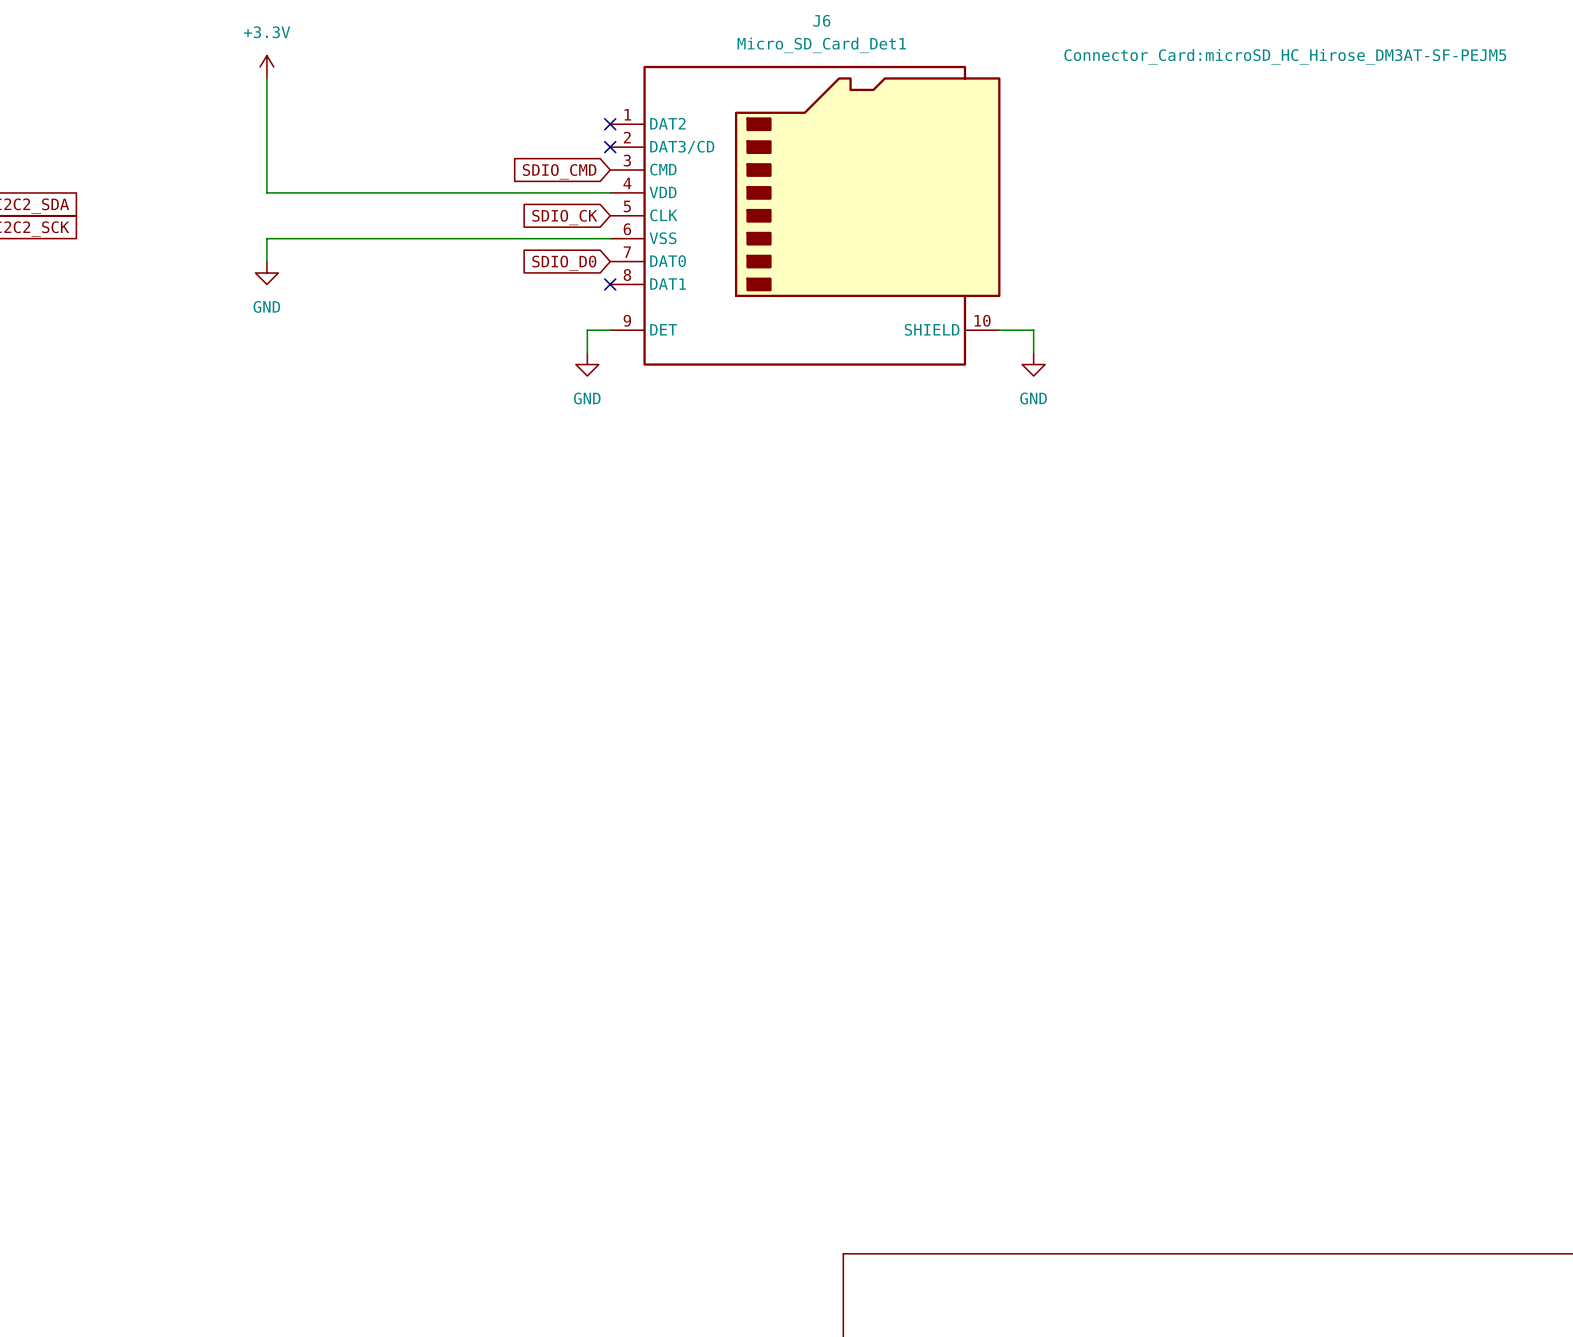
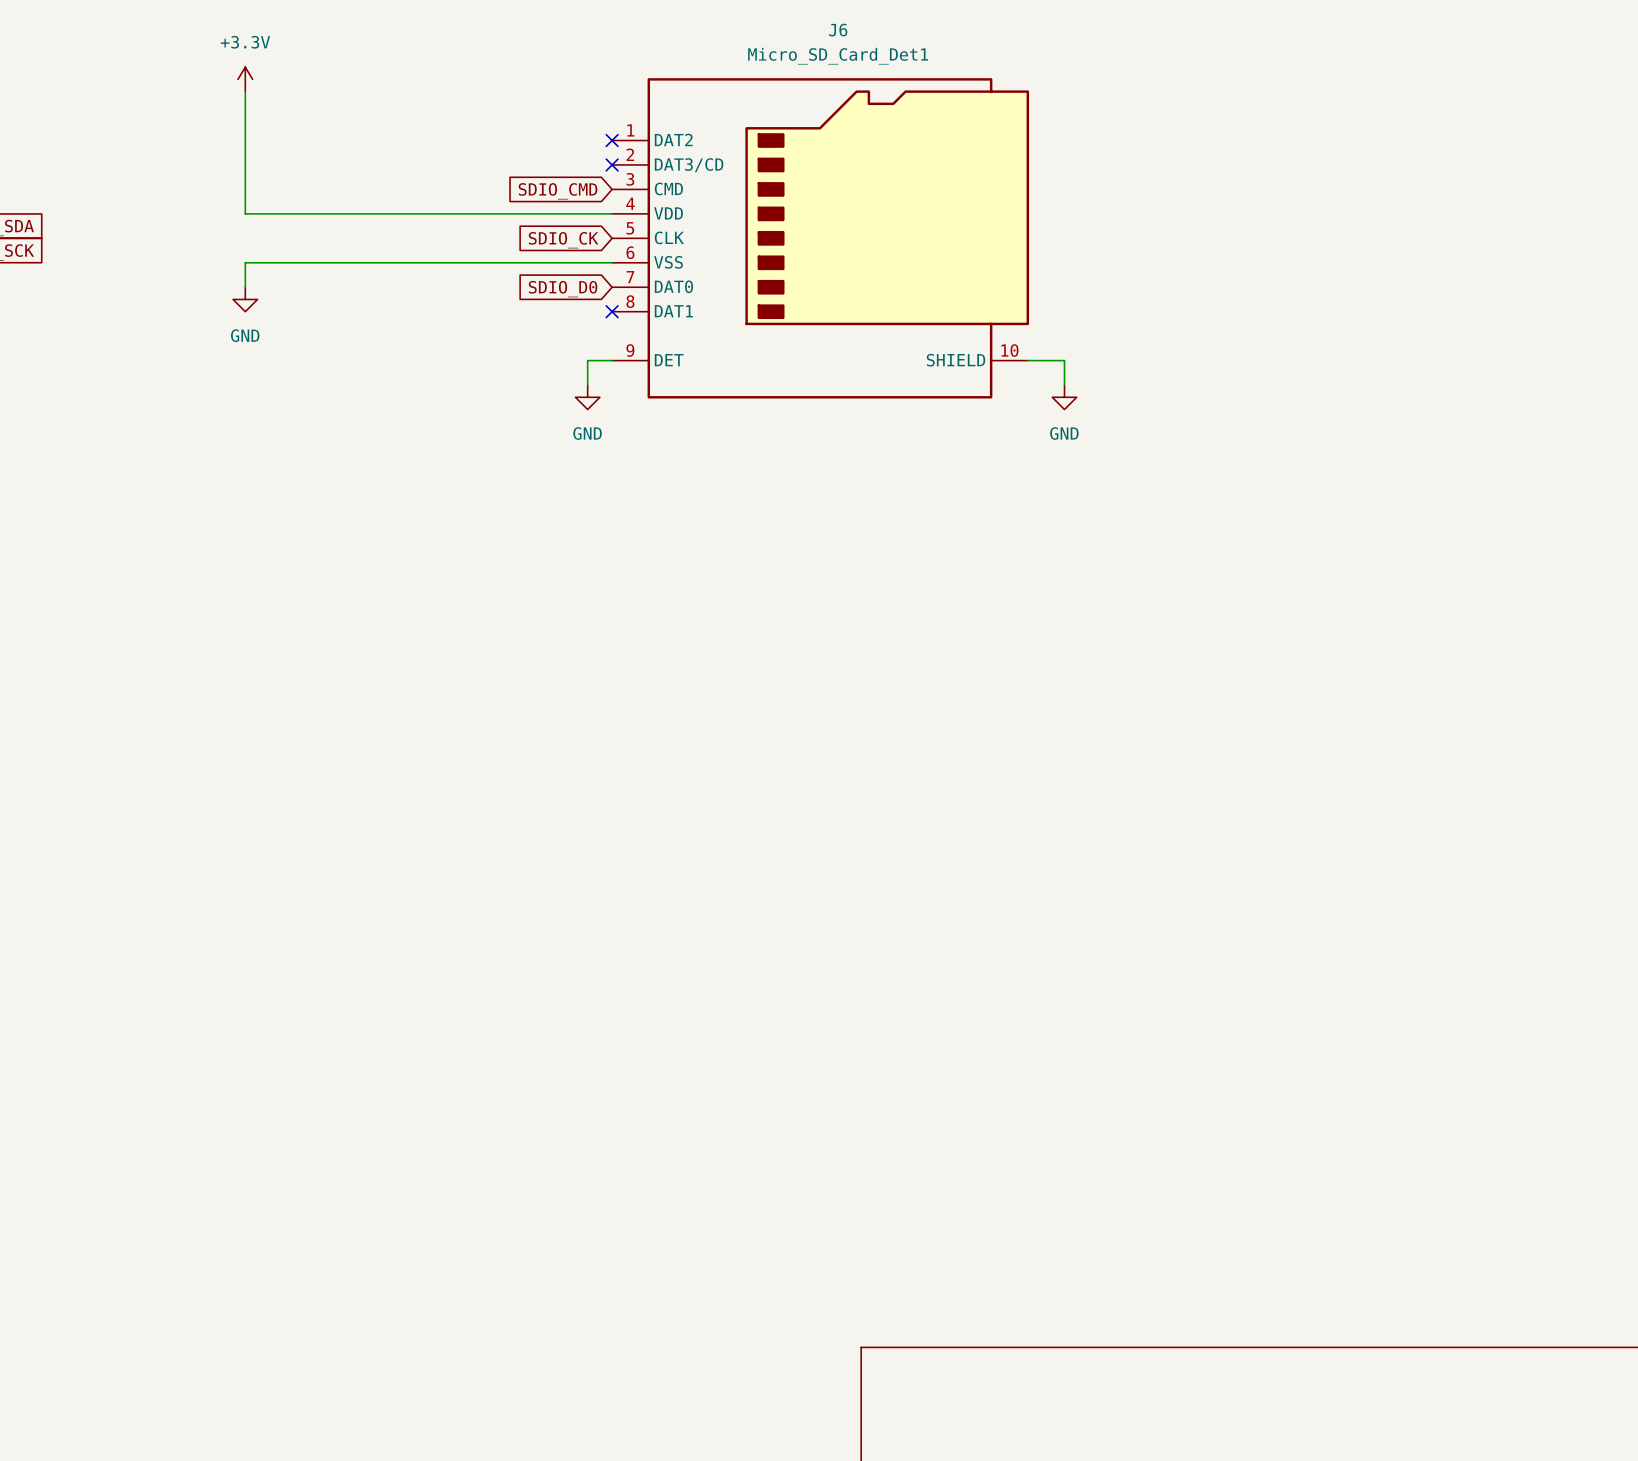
J6 text: Connector_Card:microSD_HC_Hirose_DM3AT-SF-PEJM5 (1285, 56) -> none

